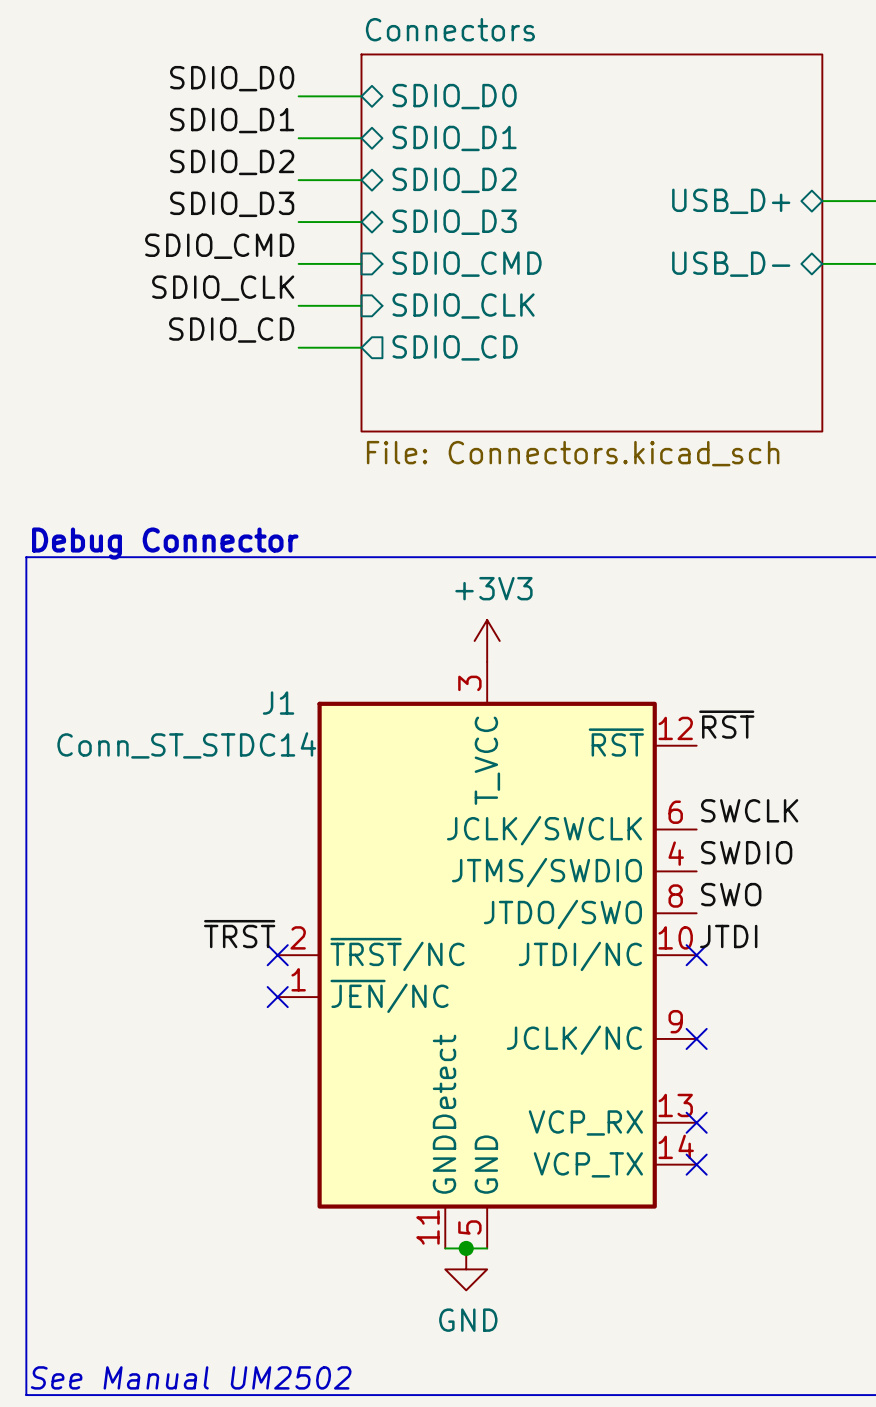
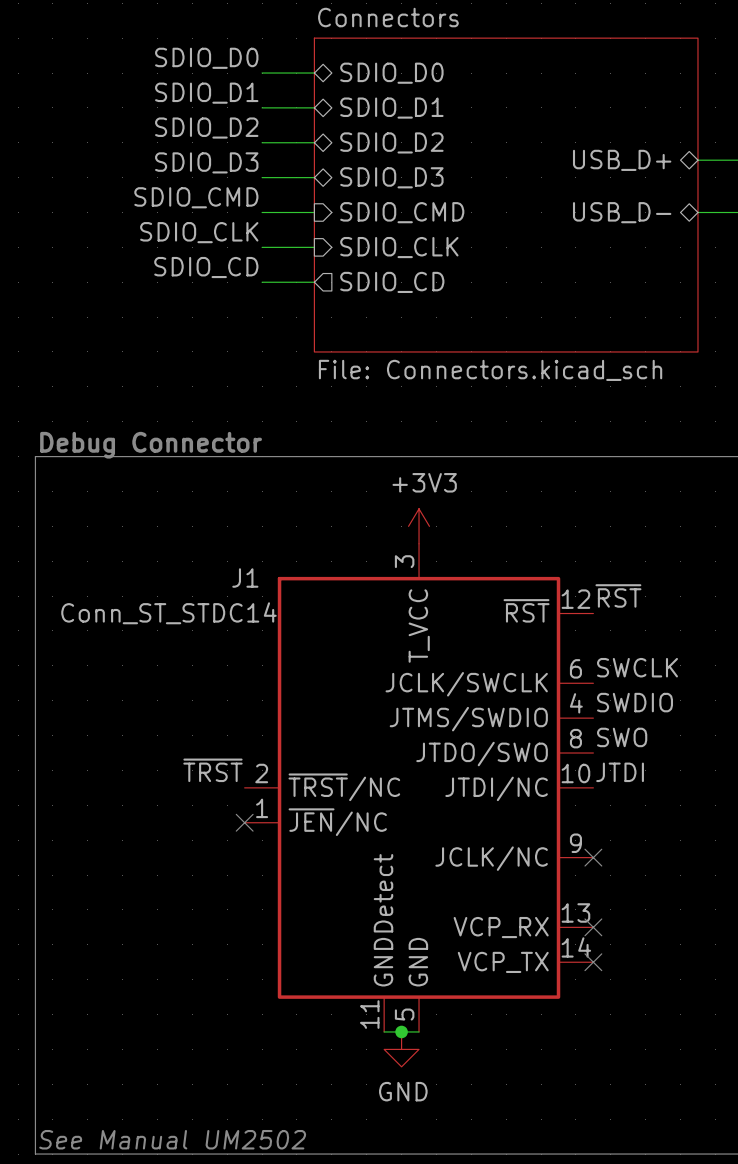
no-connect mark: (277, 955) -> none
no-connect mark: (696, 955) -> none

